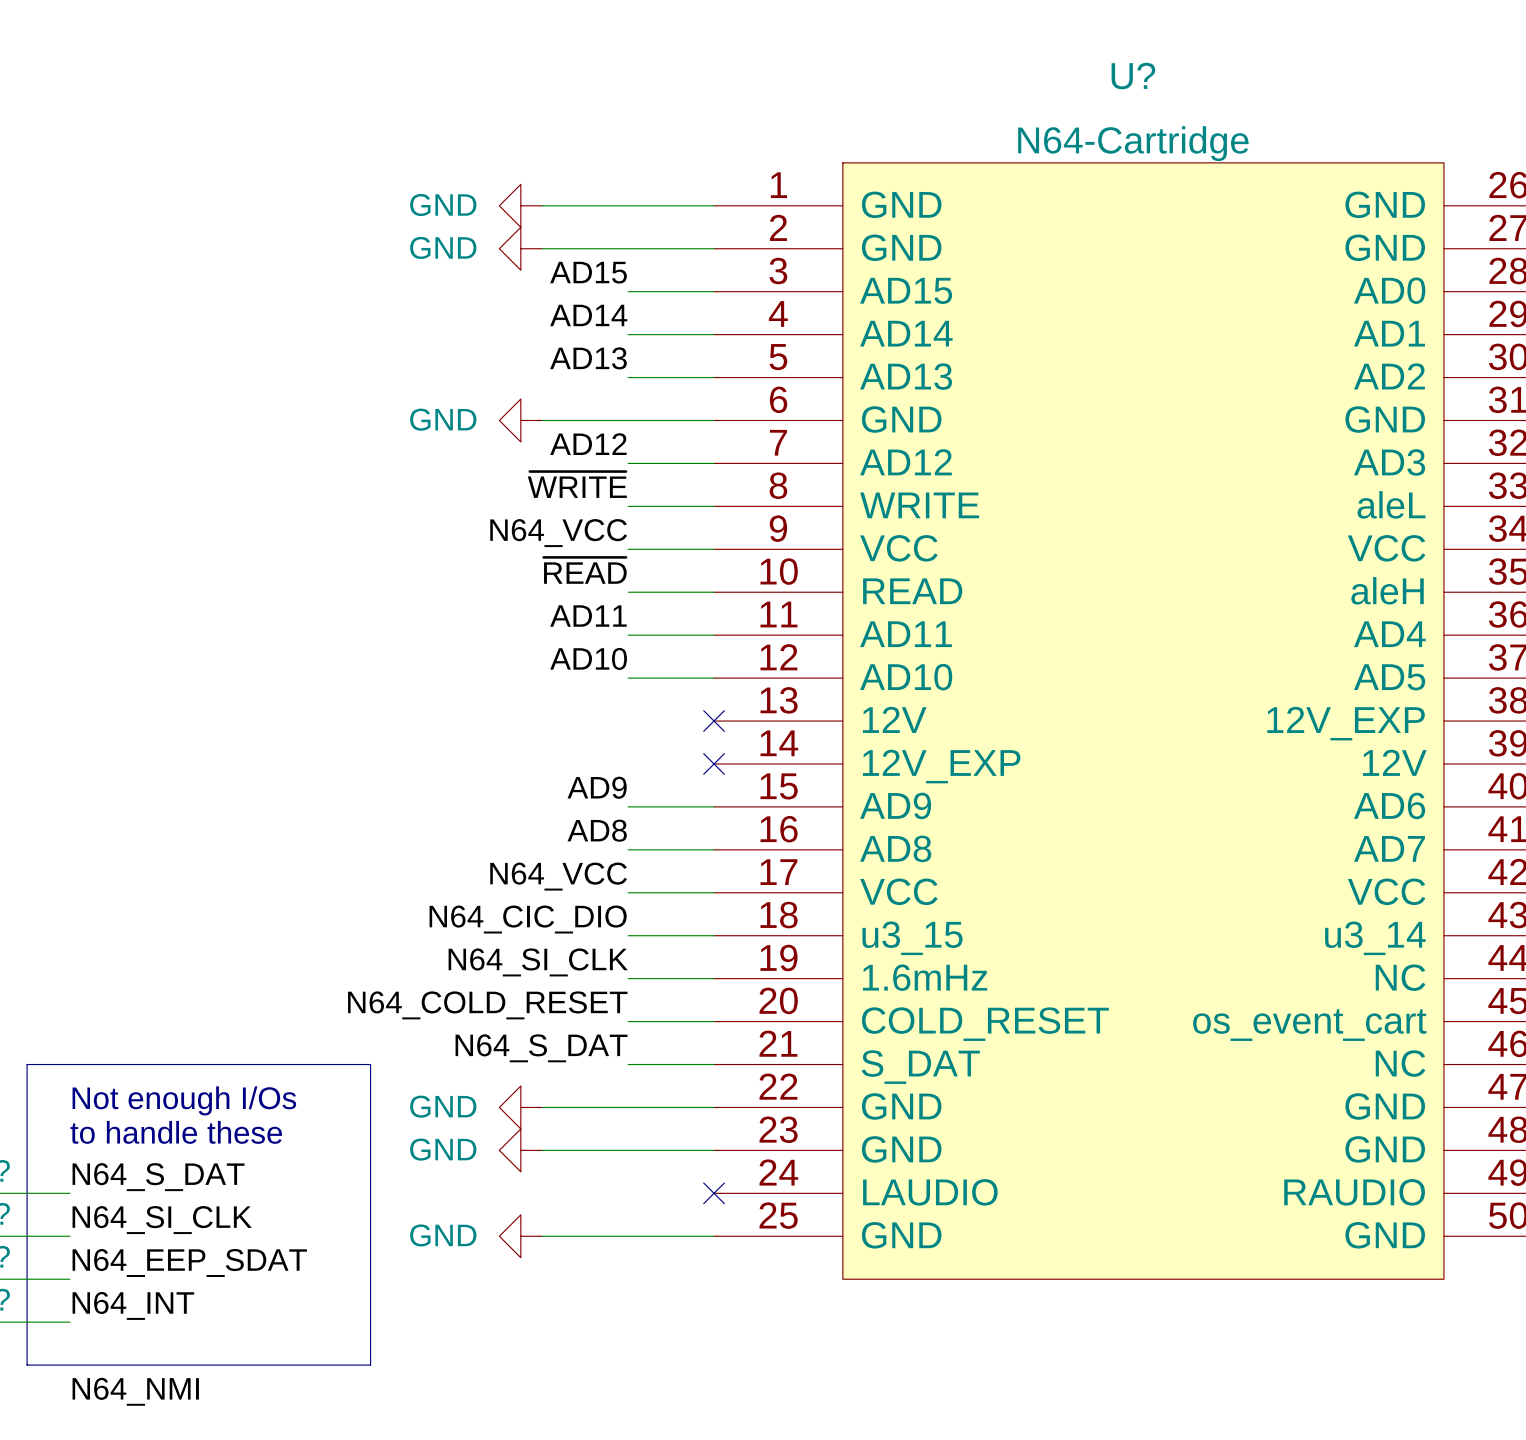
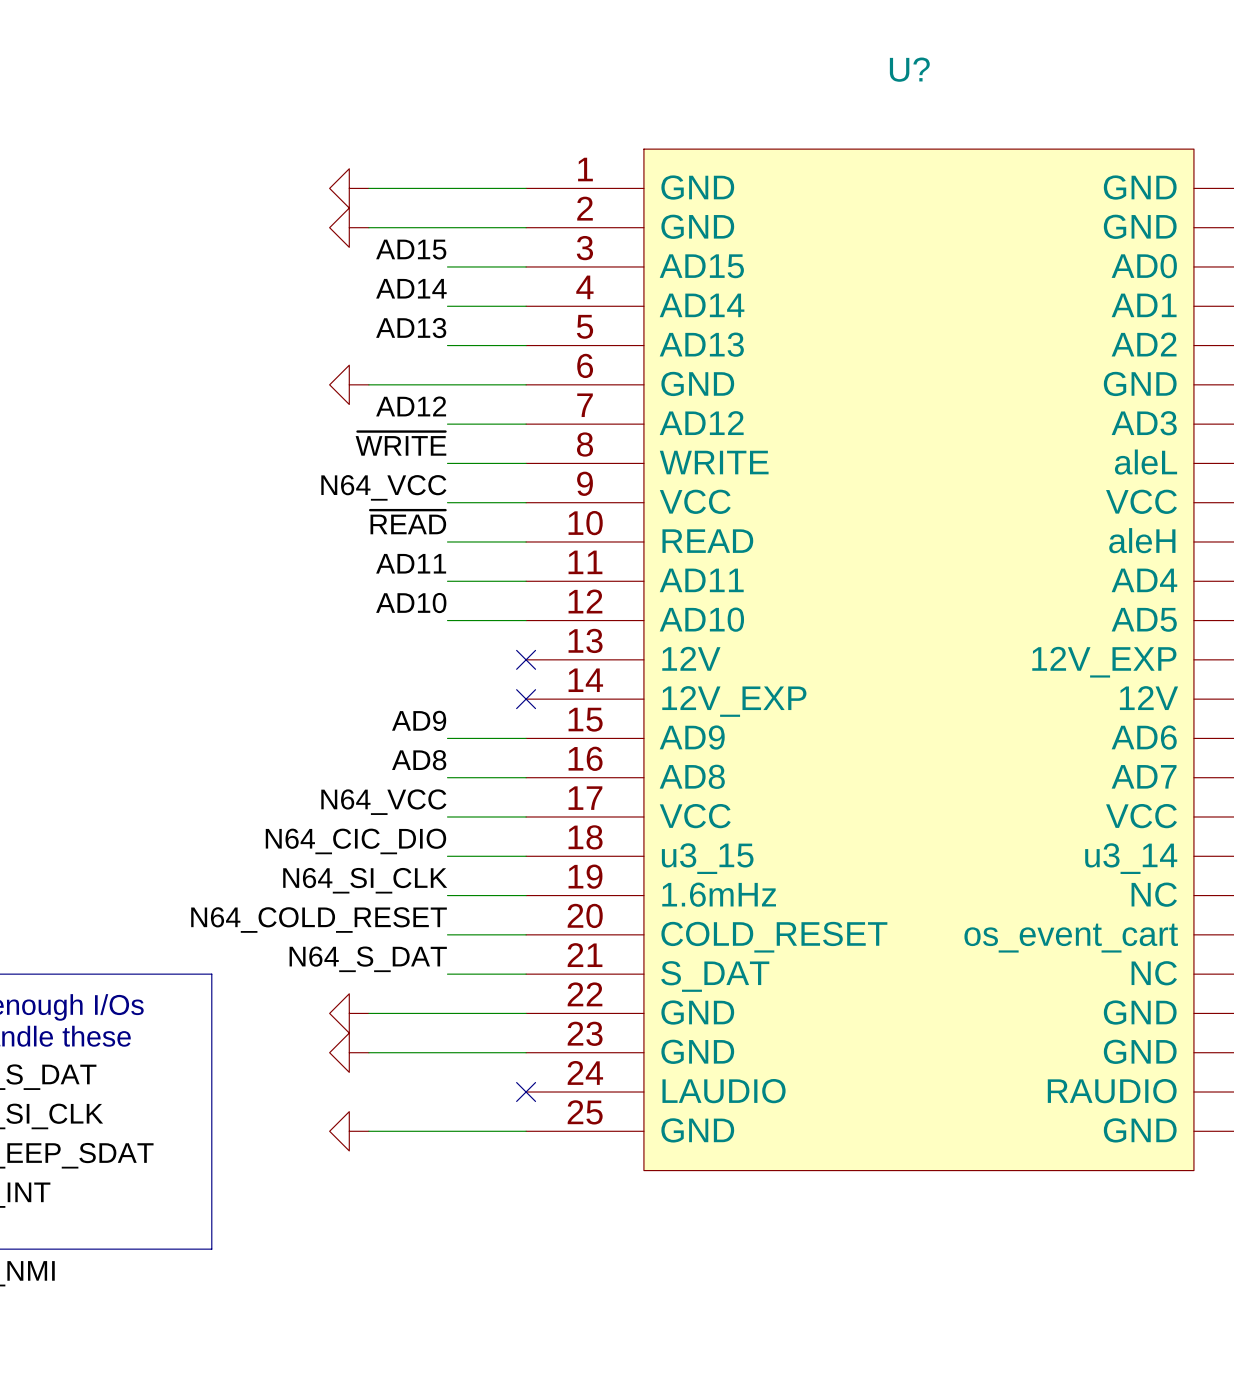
U? value: N64-Cartridge (1133, 143) -> none
power symbol text: GND (443, 205) -> none
power symbol text: GND (443, 247) -> none
power symbol text: GND (443, 419) -> none
power symbol text: GND (443, 1106) -> none
power symbol text: GND (443, 1149) -> none
power symbol text: GND (443, 1235) -> none

